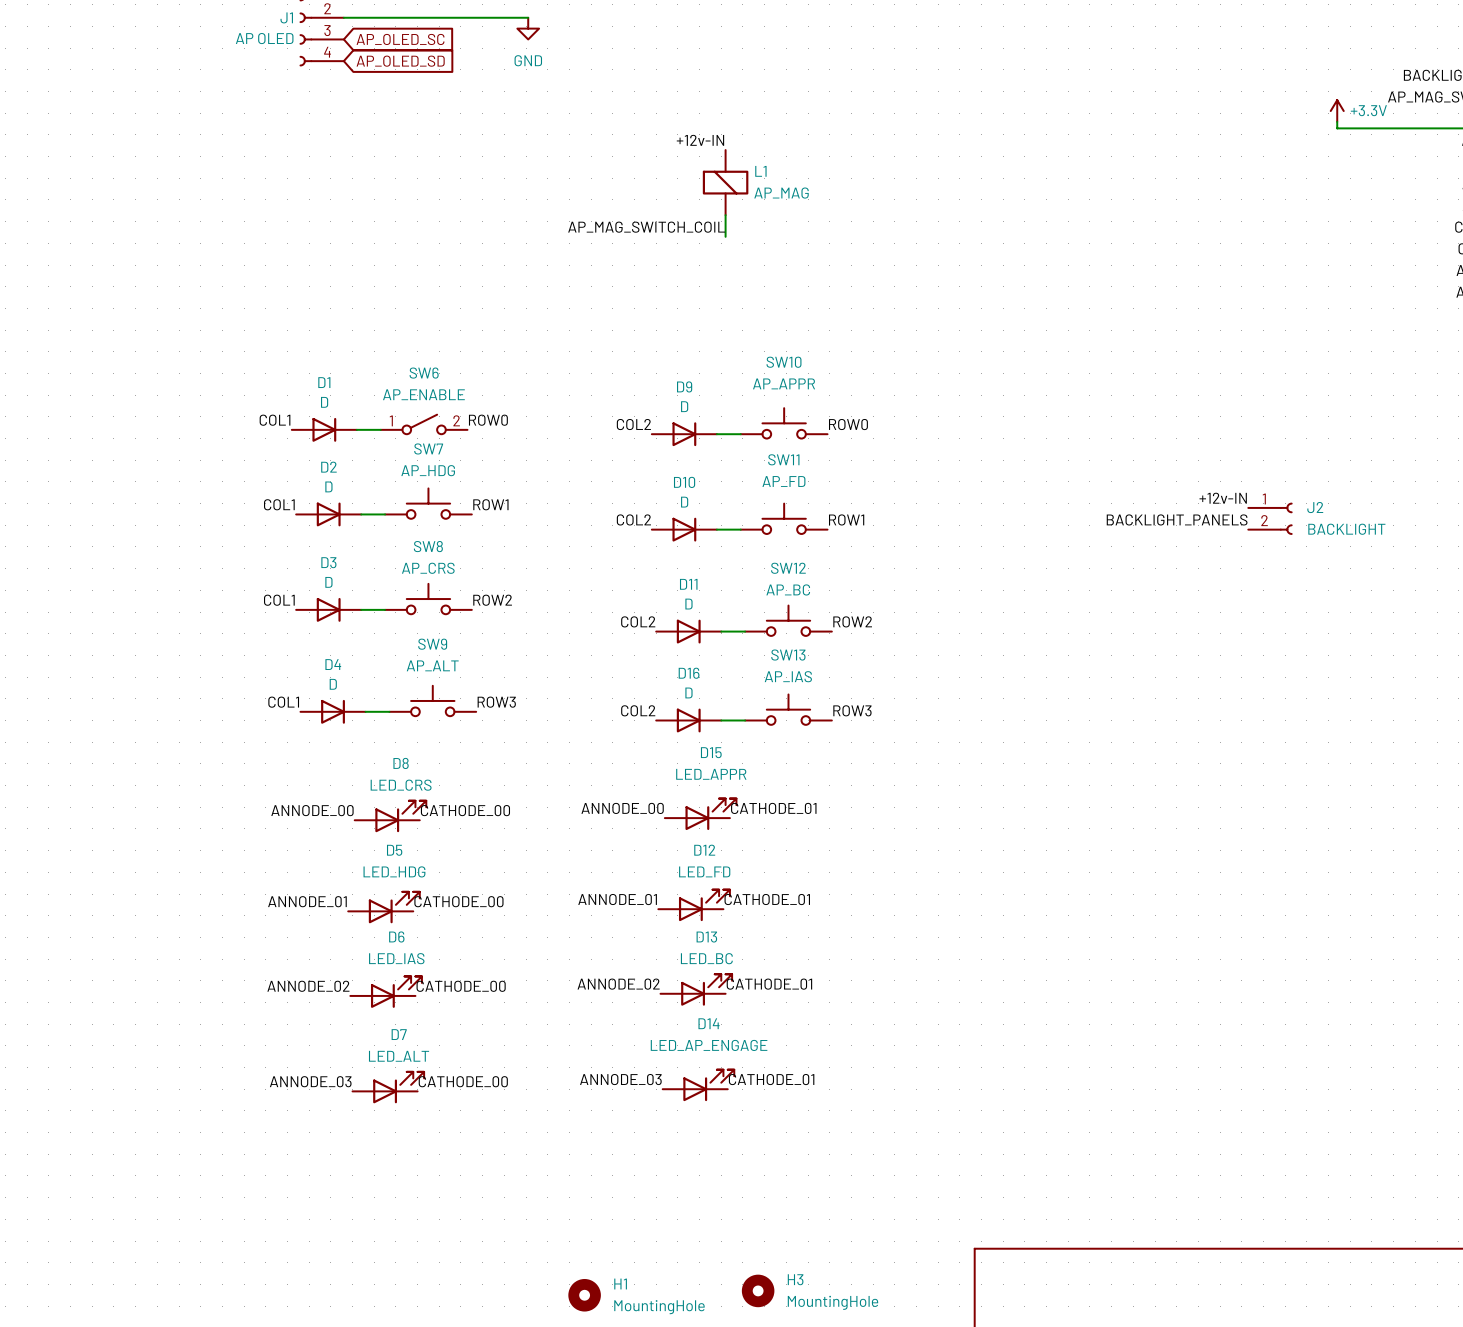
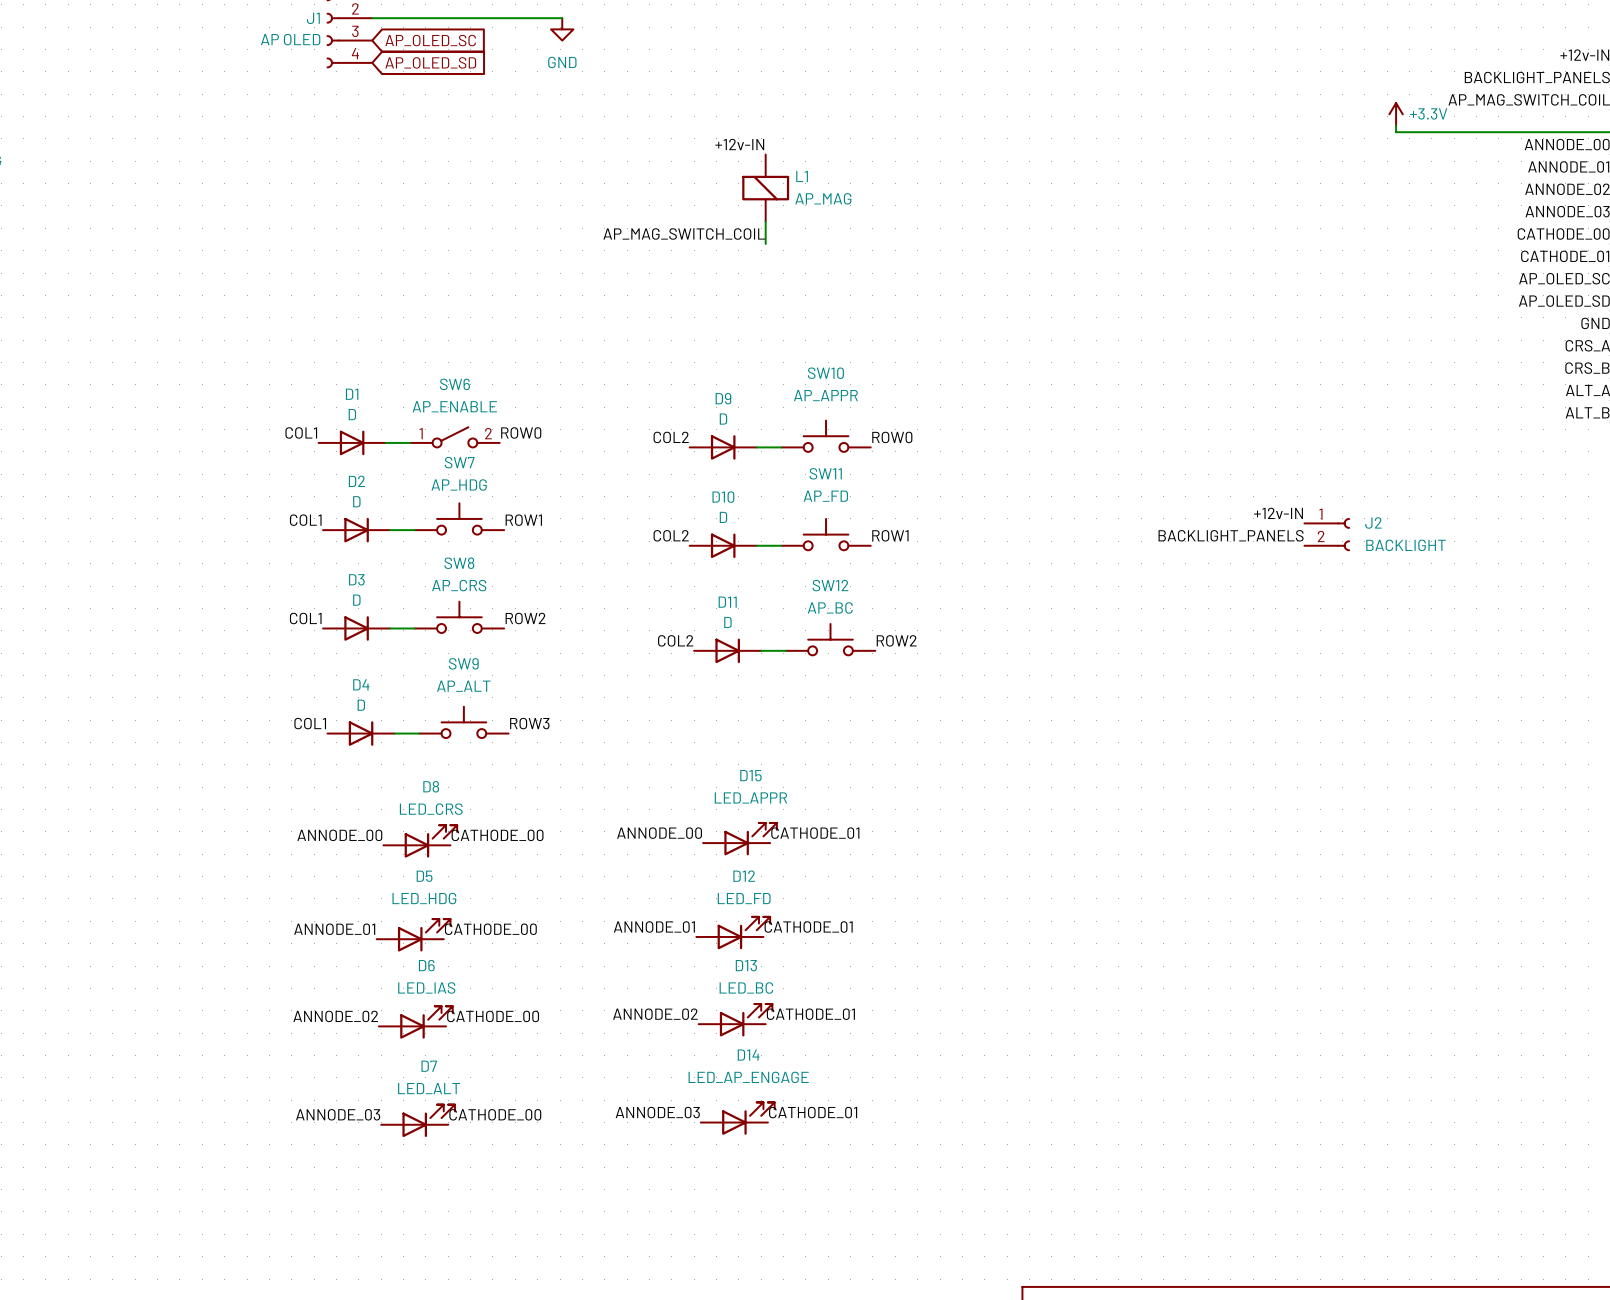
SW13: AP_IAS (788, 709) -> none
label: COL2 (638, 710) -> none
label: ROW3 (852, 710) -> none
D16: D (688, 720) -> none
wire: (721, 720) (745, 720) -> none

